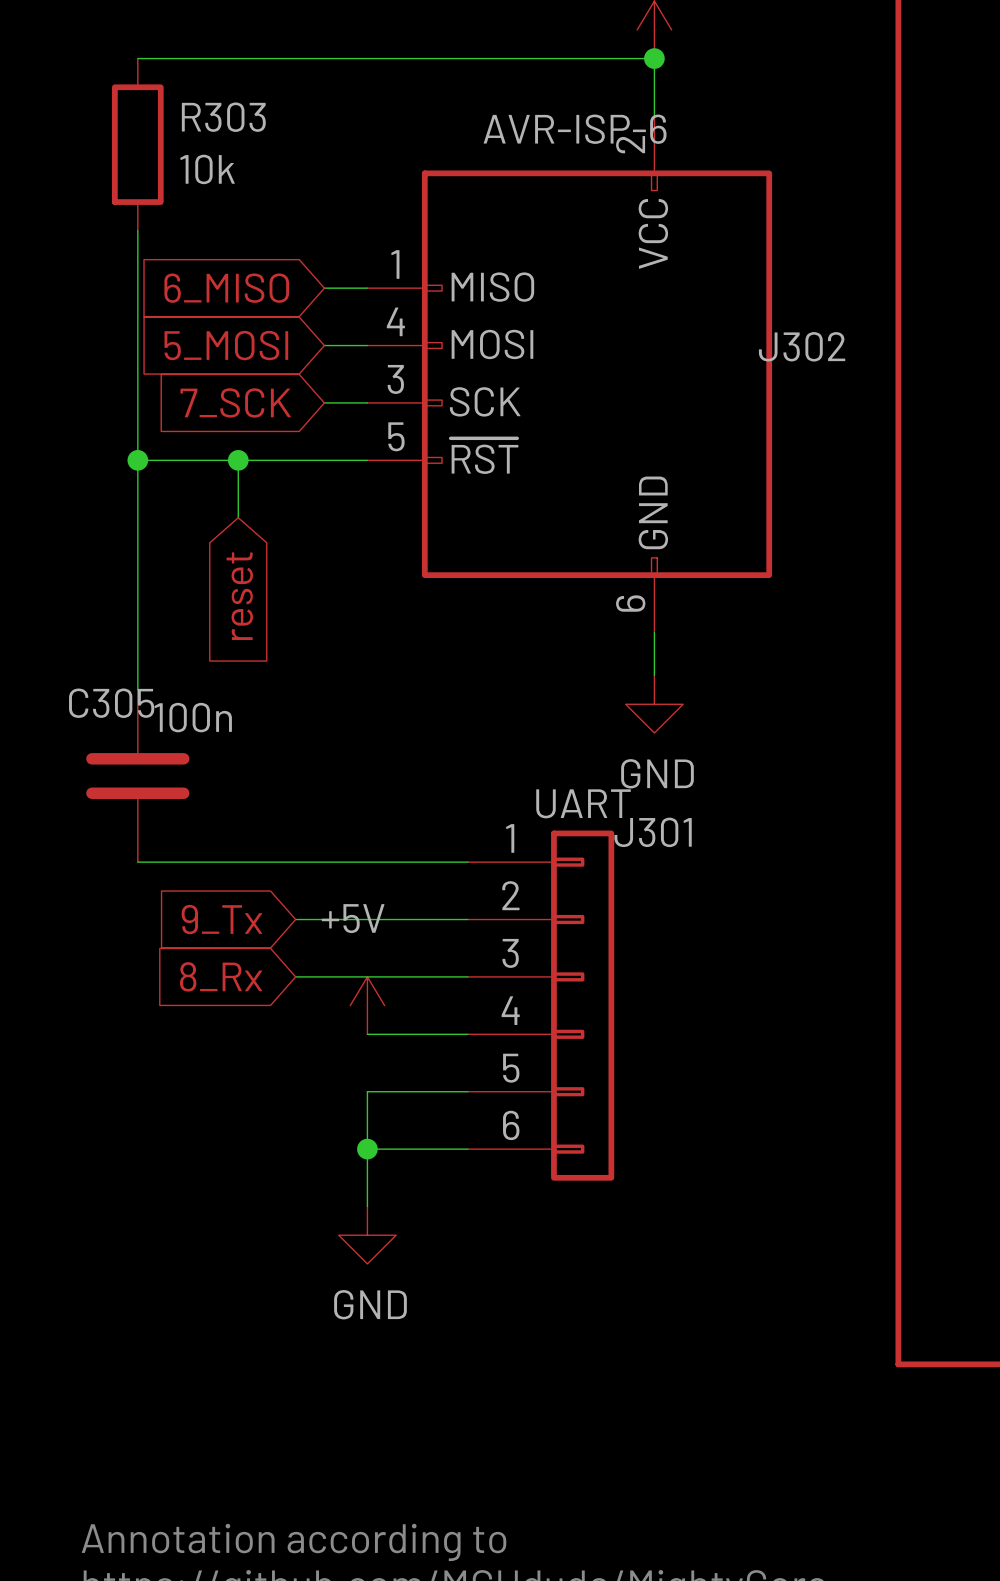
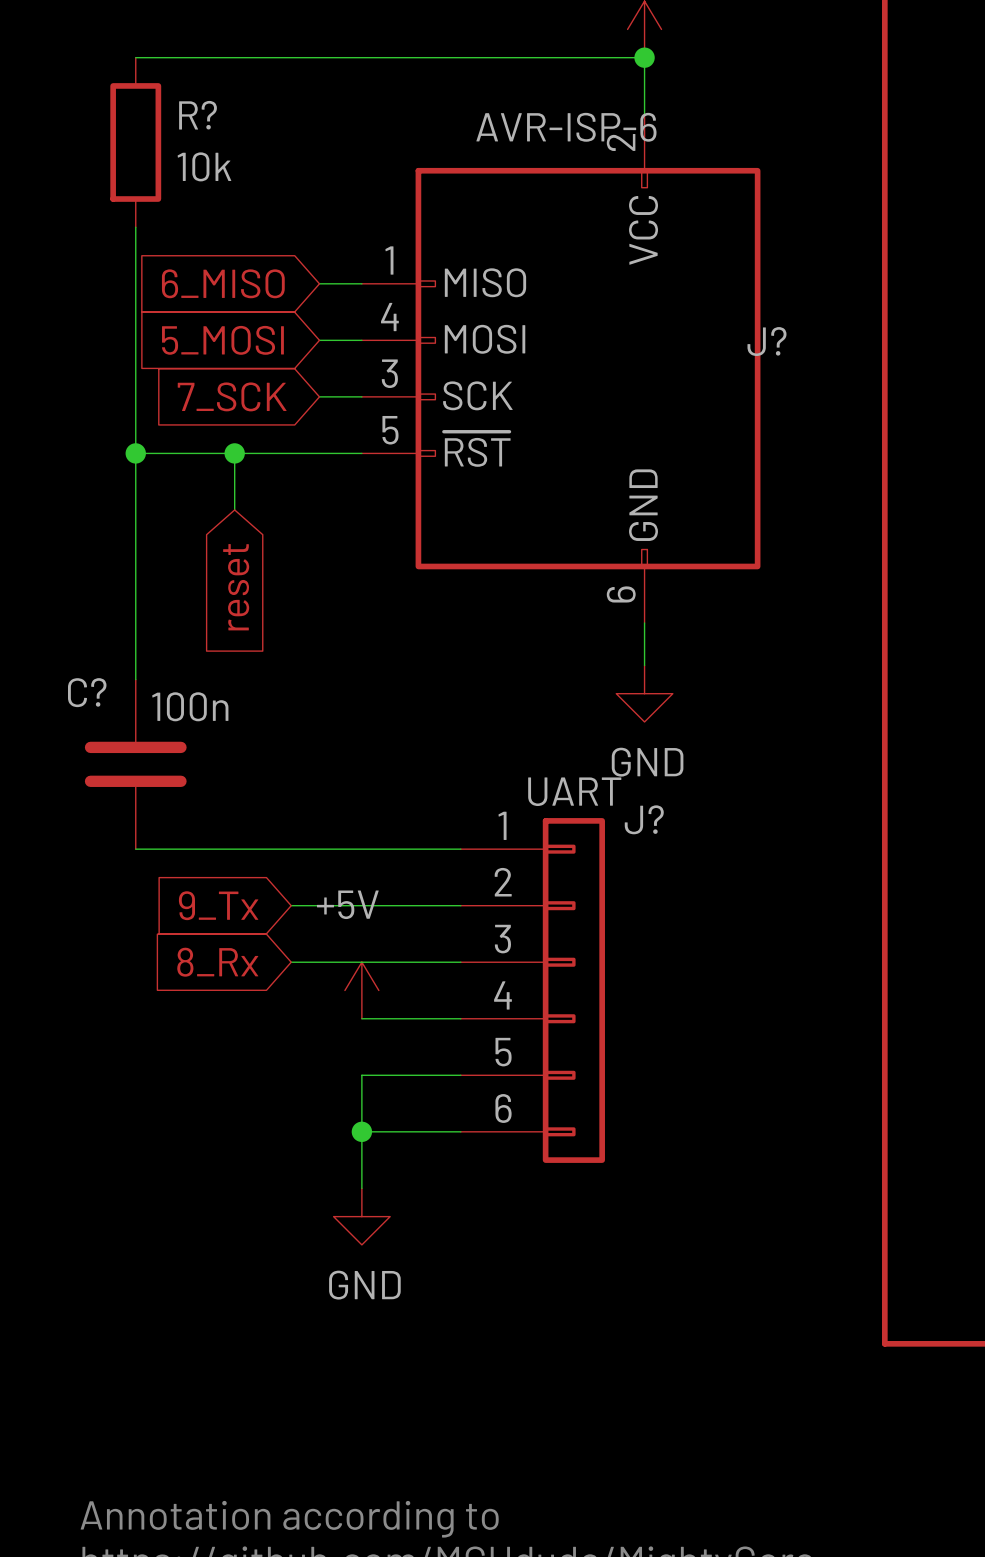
R303 name: R303 (223, 117) -> R? (198, 115)
J302 name: J302 (802, 346) -> J? (766, 341)
C305 name: C305 (111, 703) -> C? (87, 692)
J301 name: J301 (653, 832) -> J? (644, 819)

